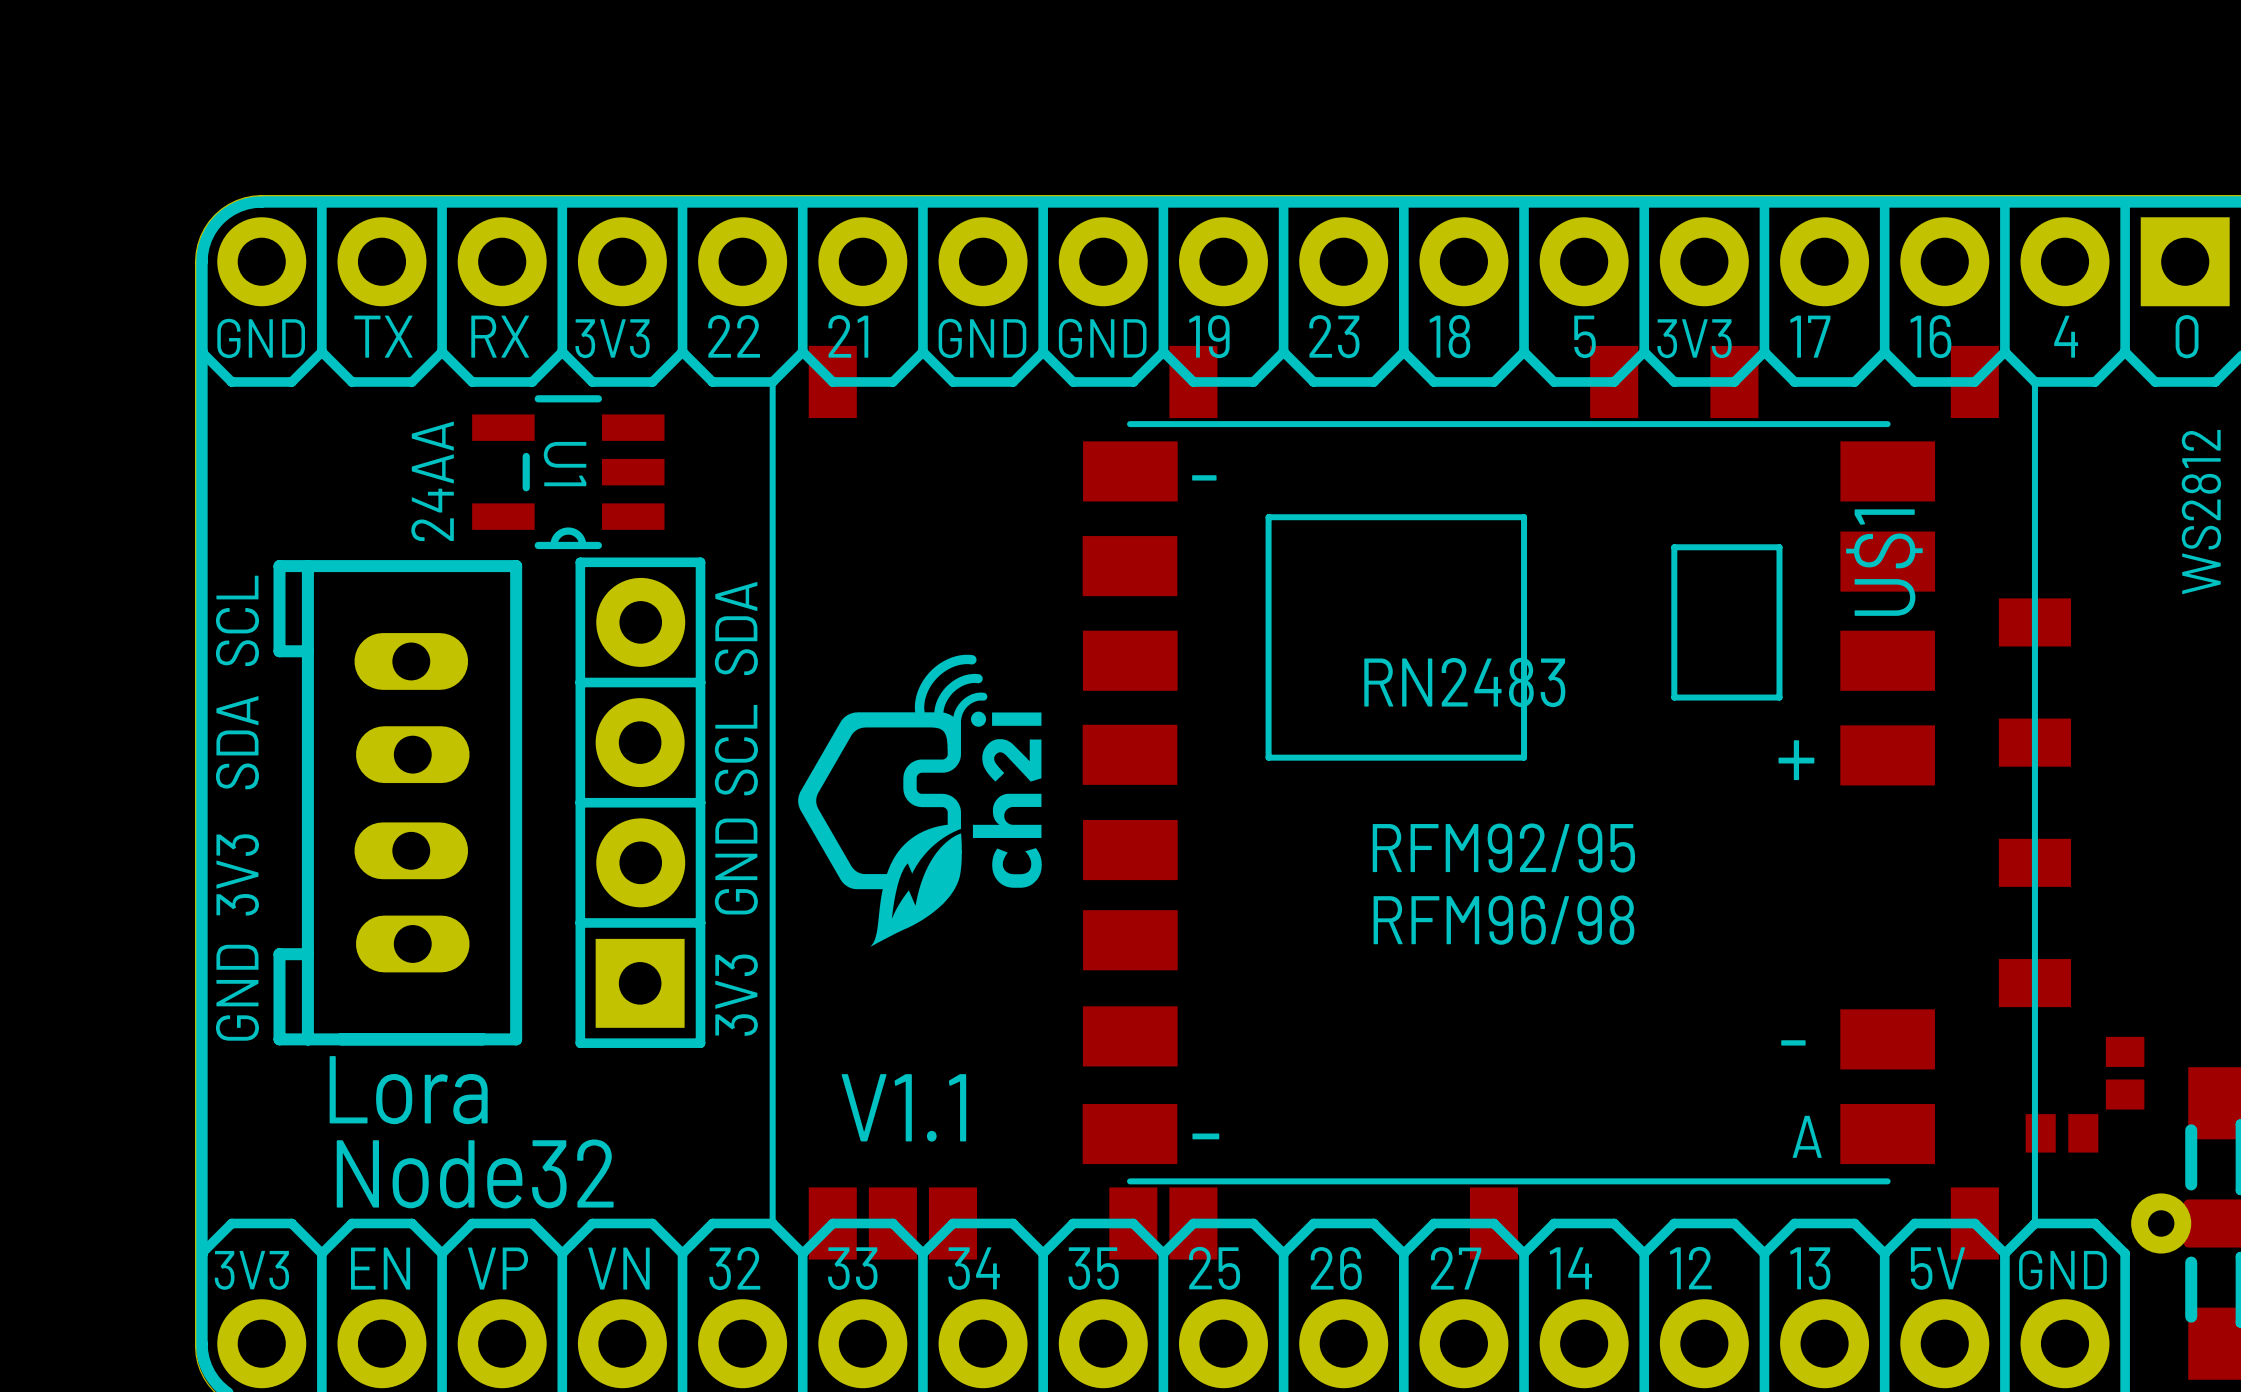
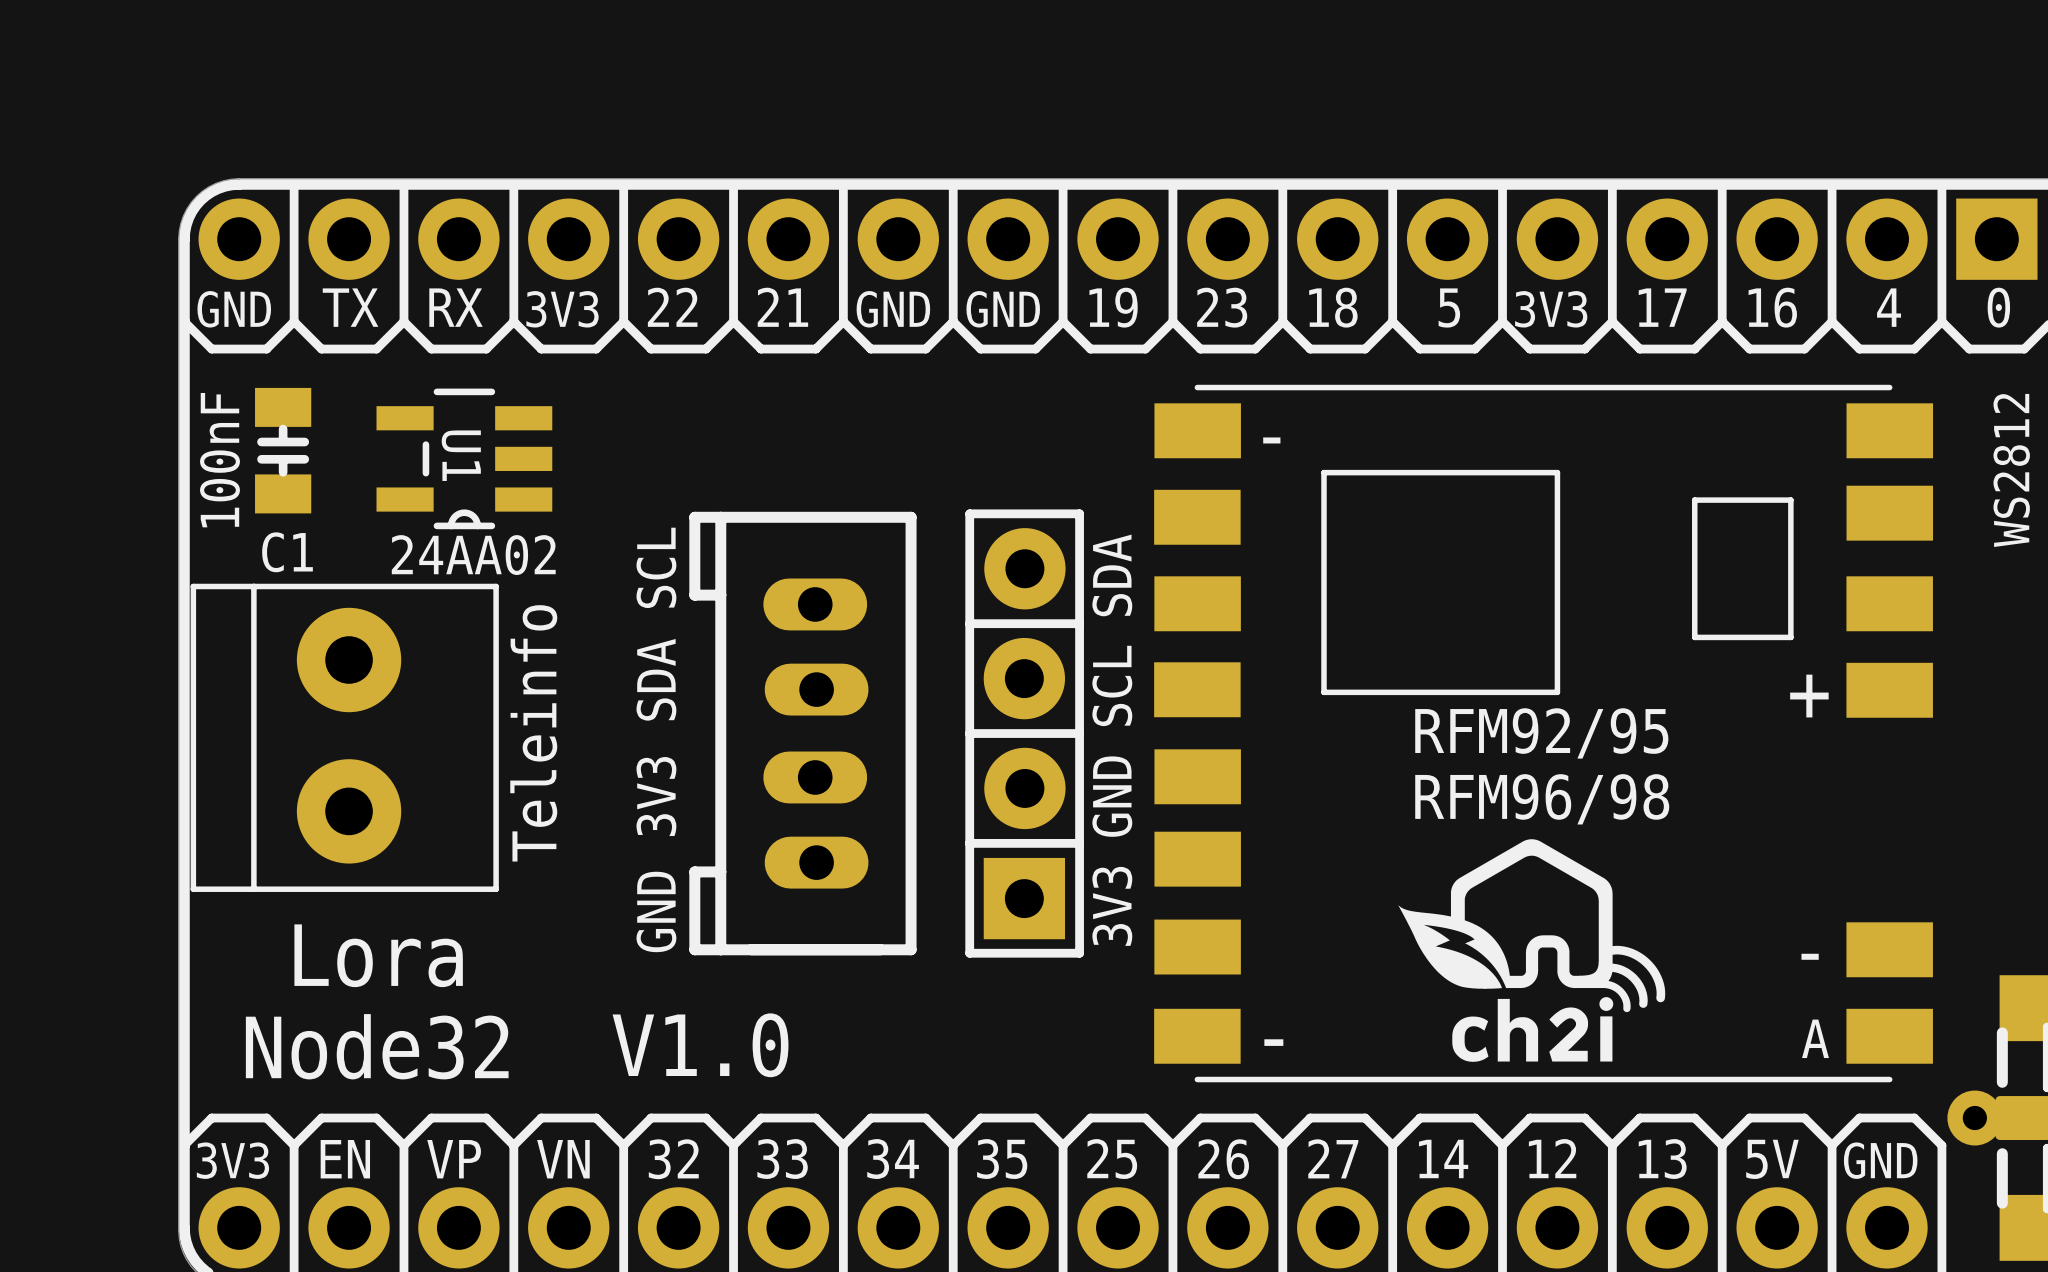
U1 position: (568, 472) -> (464, 458)
text: 24AA (432, 481) -> none
C1: none -> 100nF (283, 450)
part footprint: [273, 560, 523, 1046] -> [190, 583, 499, 892]
text: none -> 24AA02 (473, 555)
text: SCL (237, 620) -> none
text position: SDA (736, 628) -> SDA (656, 679)
text: none -> SDA (1112, 575)
drawing: [798, 654, 1042, 947] -> none
text: SDA (237, 742) -> none
text position: SCL (736, 750) -> SCL (656, 567)
text: none -> SCL (1112, 685)
text: none -> Teleinfo (533, 733)
part position: (640, 802) -> (1024, 733)
part: none -> (802, 733)
U$1: RN2483 (1420, 802) -> none
part position: (1508, 802) -> (1543, 733)
text position: RFM92/95 (1503, 848) -> RFM92/95 (1541, 733)
text position: GND (736, 866) -> GND (656, 911)
text: none -> GND (1112, 796)
text: 3V3 (237, 874) -> none
drawing: none -> [1398, 839, 1666, 1062]
text position: RFM96/98 (1503, 920) -> RFM96/98 (1542, 799)
text: GND (237, 992) -> none
text position: 3V3 (736, 995) -> 3V3 (656, 796)
text: none -> 3V3 (1112, 906)
part: (2125, 1073) -> none
text position: Lora (408, 1090) -> Lora (378, 955)
text: V1.1 (903, 1107) -> V1.0 (700, 1045)
part: (2062, 1133) -> none
text position: Node32 (475, 1173) -> Node32 (377, 1046)

